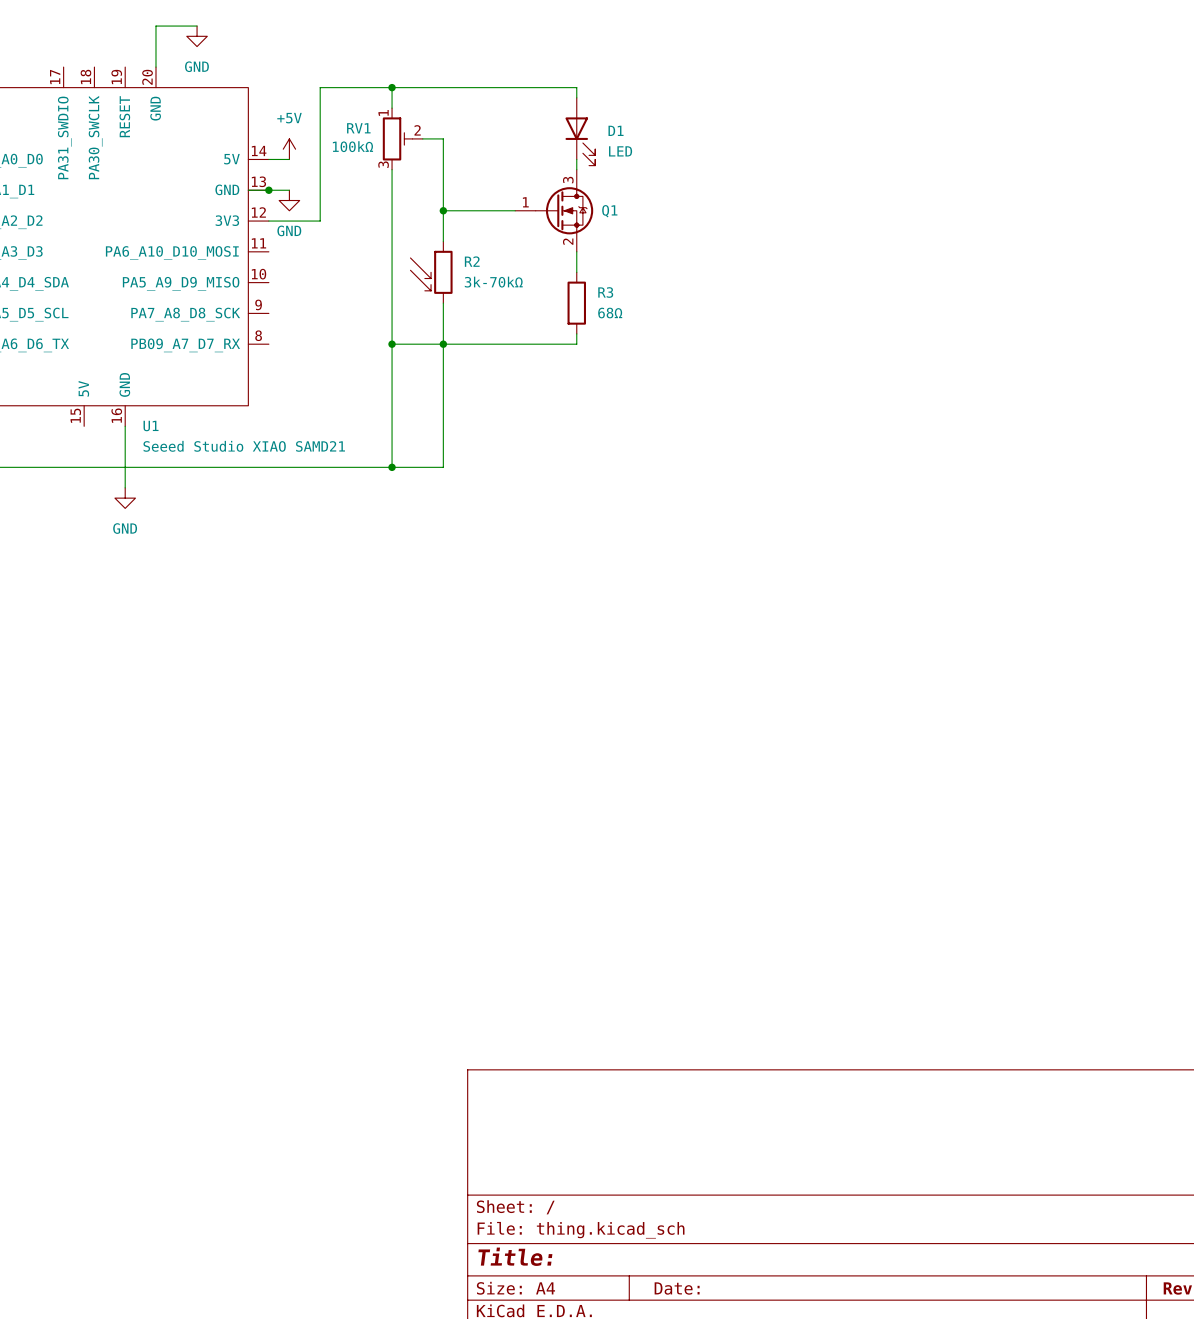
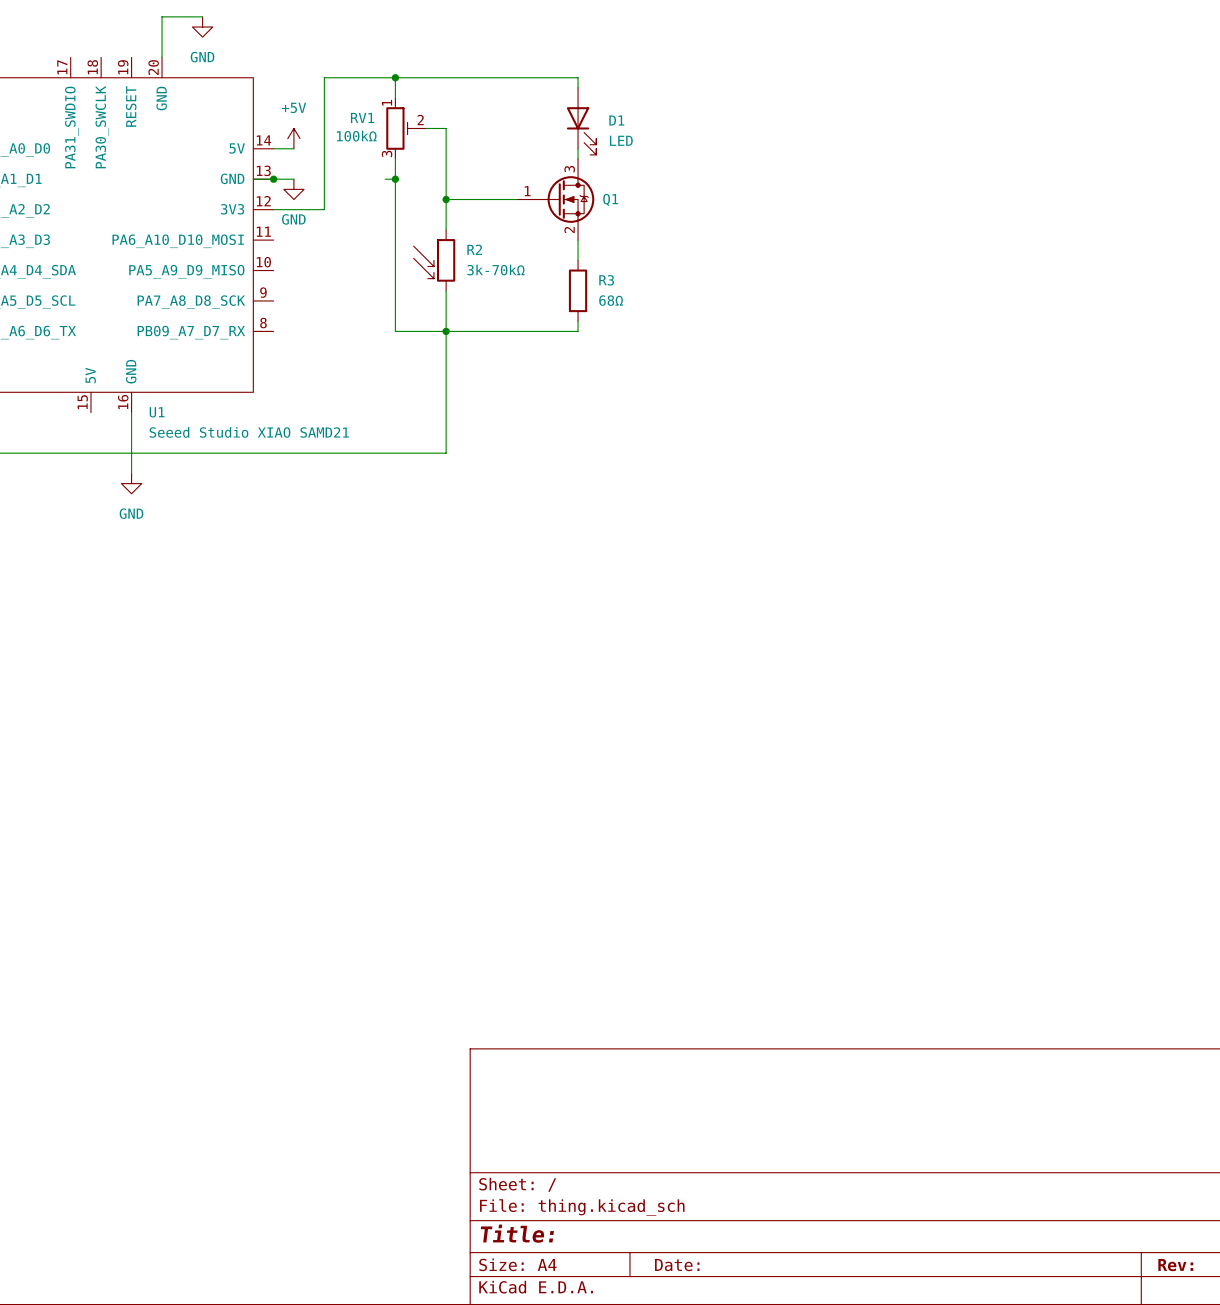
wire: none -> (385, 179) (395, 179)
junction: none -> (395, 179)
wire: (392, 344) (392, 467) -> none
junction: (392, 344) -> none
junction: (392, 467) -> none

